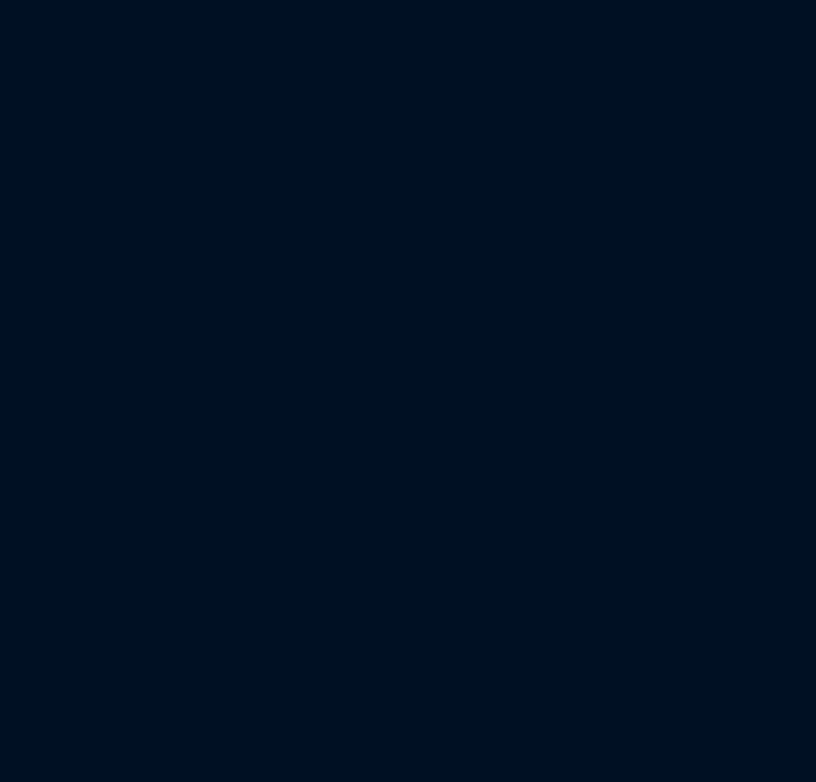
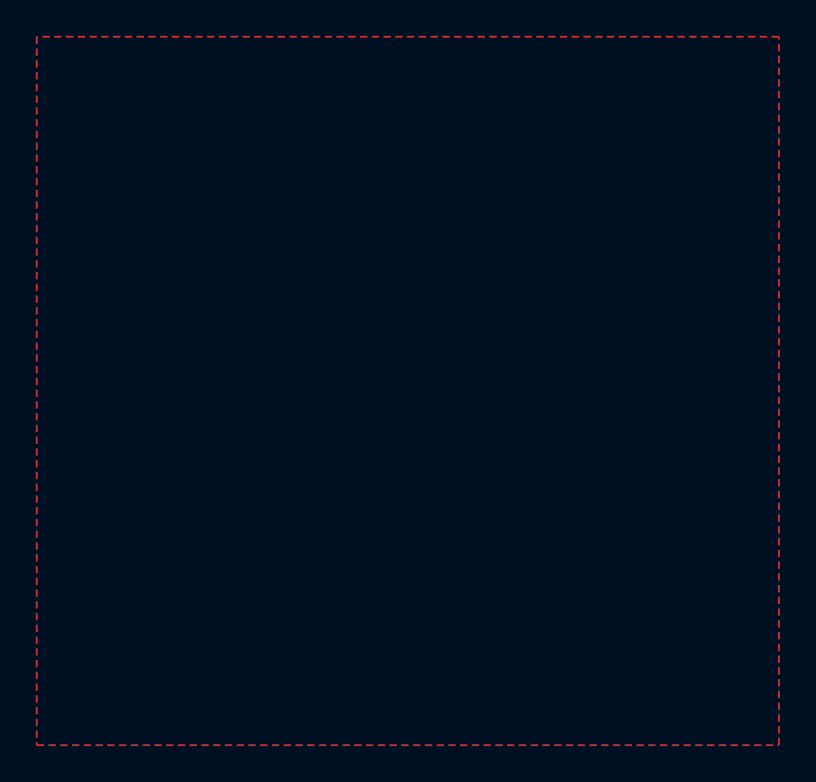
zone outline: none -> (36, 36) (778, 36) (778, 745) (36, 745) (36, 36)

